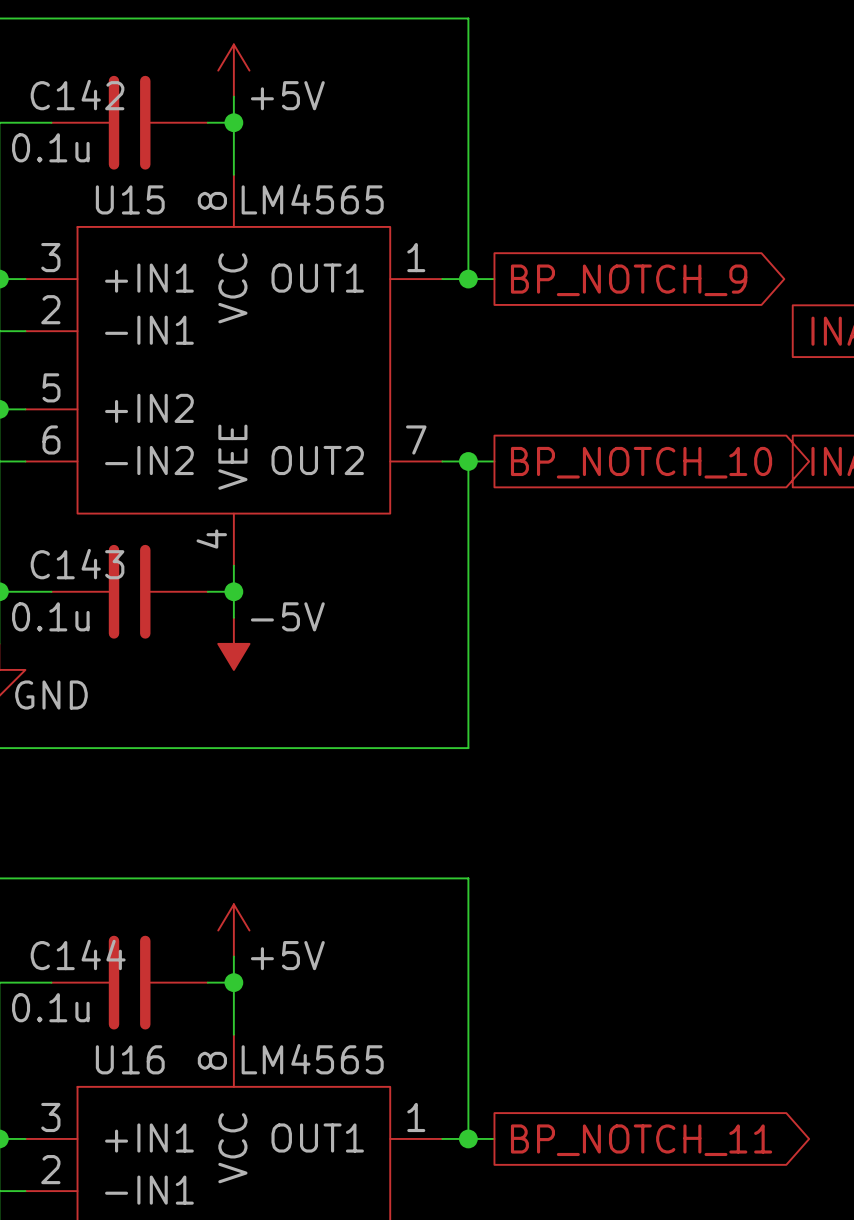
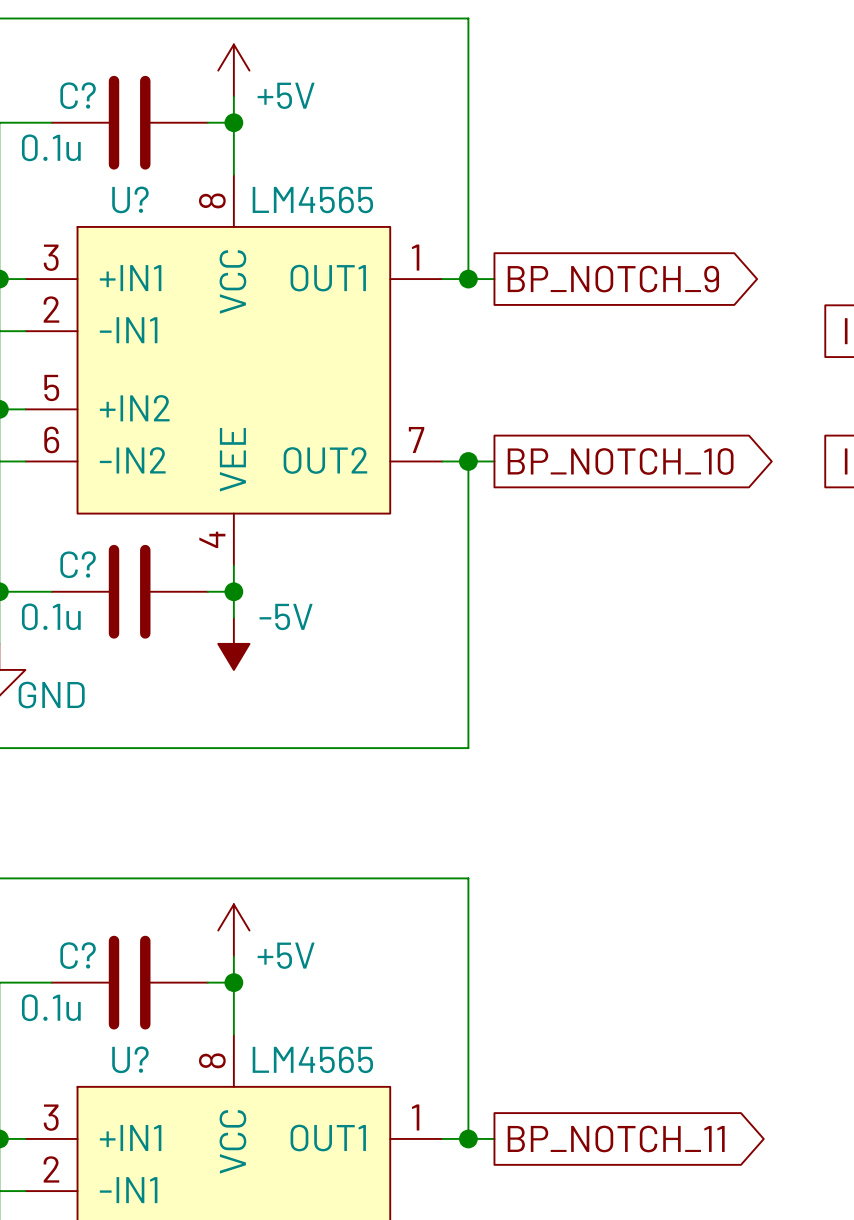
C142 name: C142 (77, 95) -> C? (78, 95)
U15 name: U15 (130, 199) -> U? (130, 199)
C143 name: C143 (77, 564) -> C? (78, 564)
C144 name: C144 (78, 954) -> C? (78, 955)
U16 name: U16 (130, 1059) -> U? (130, 1059)

